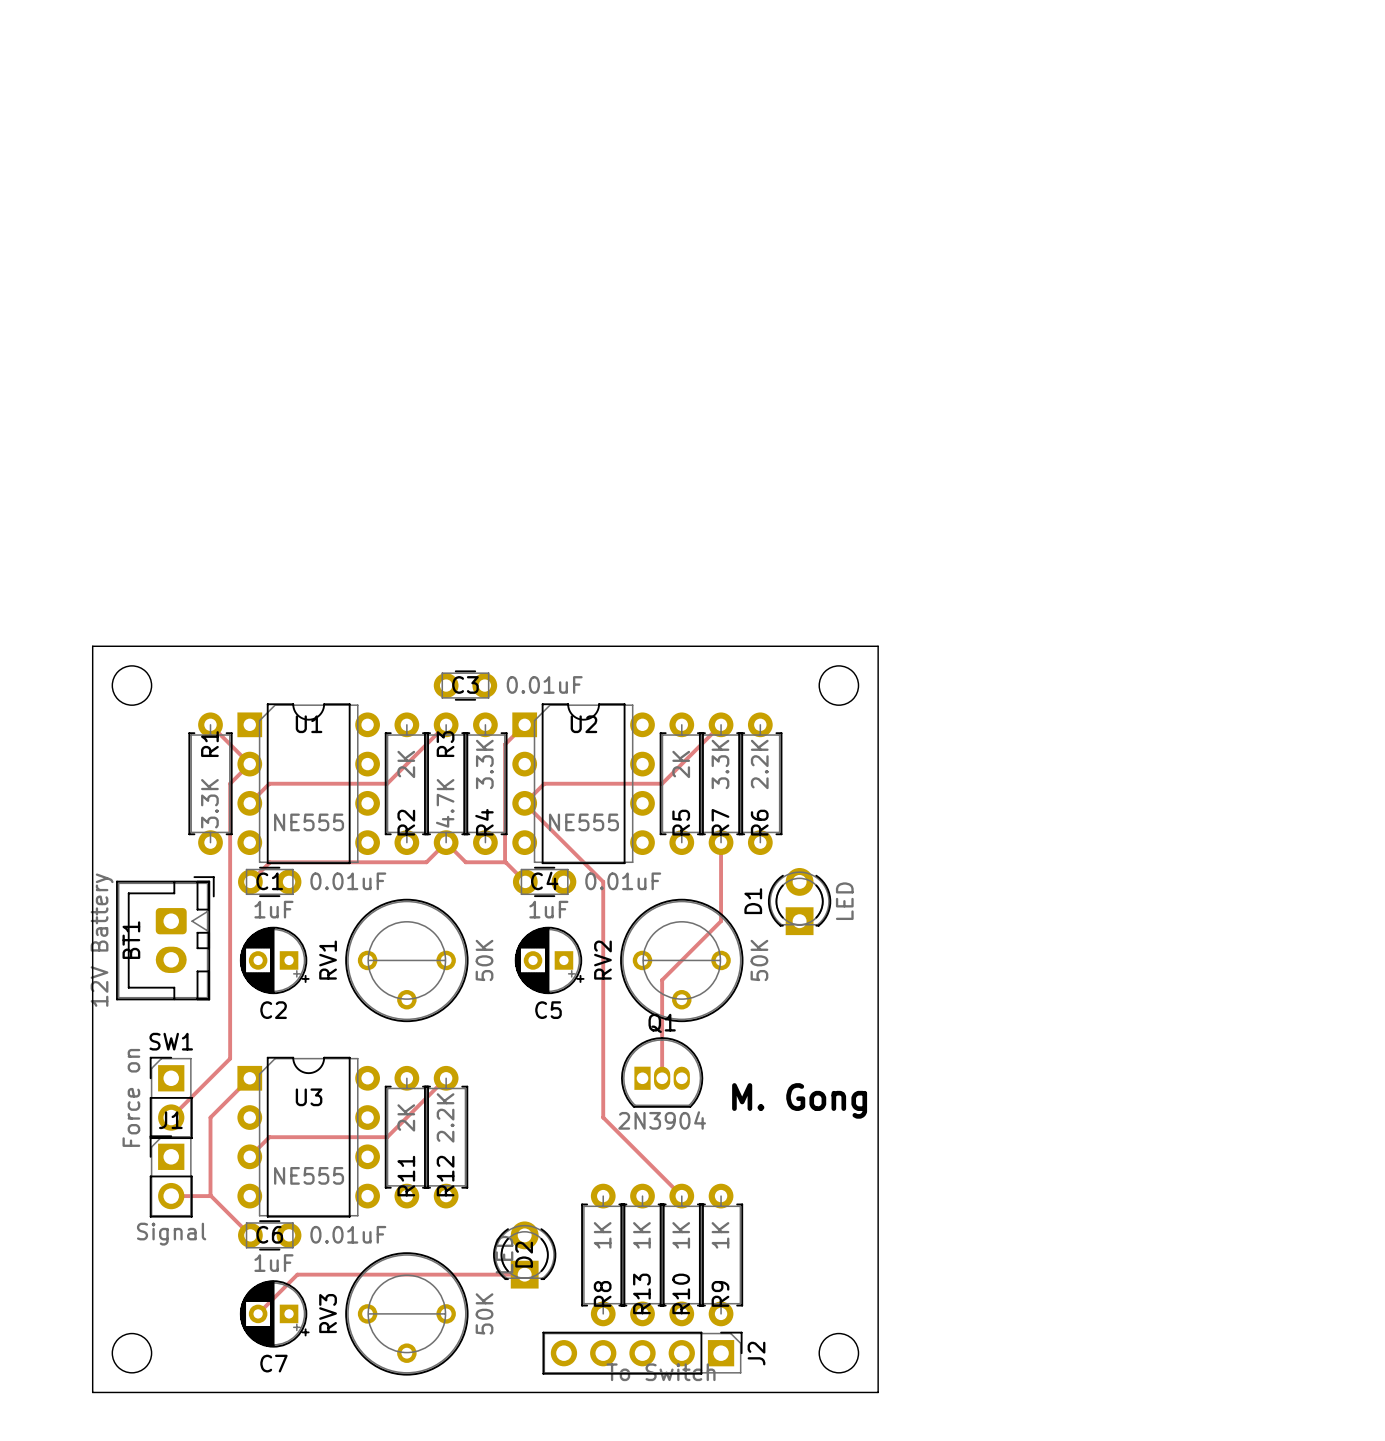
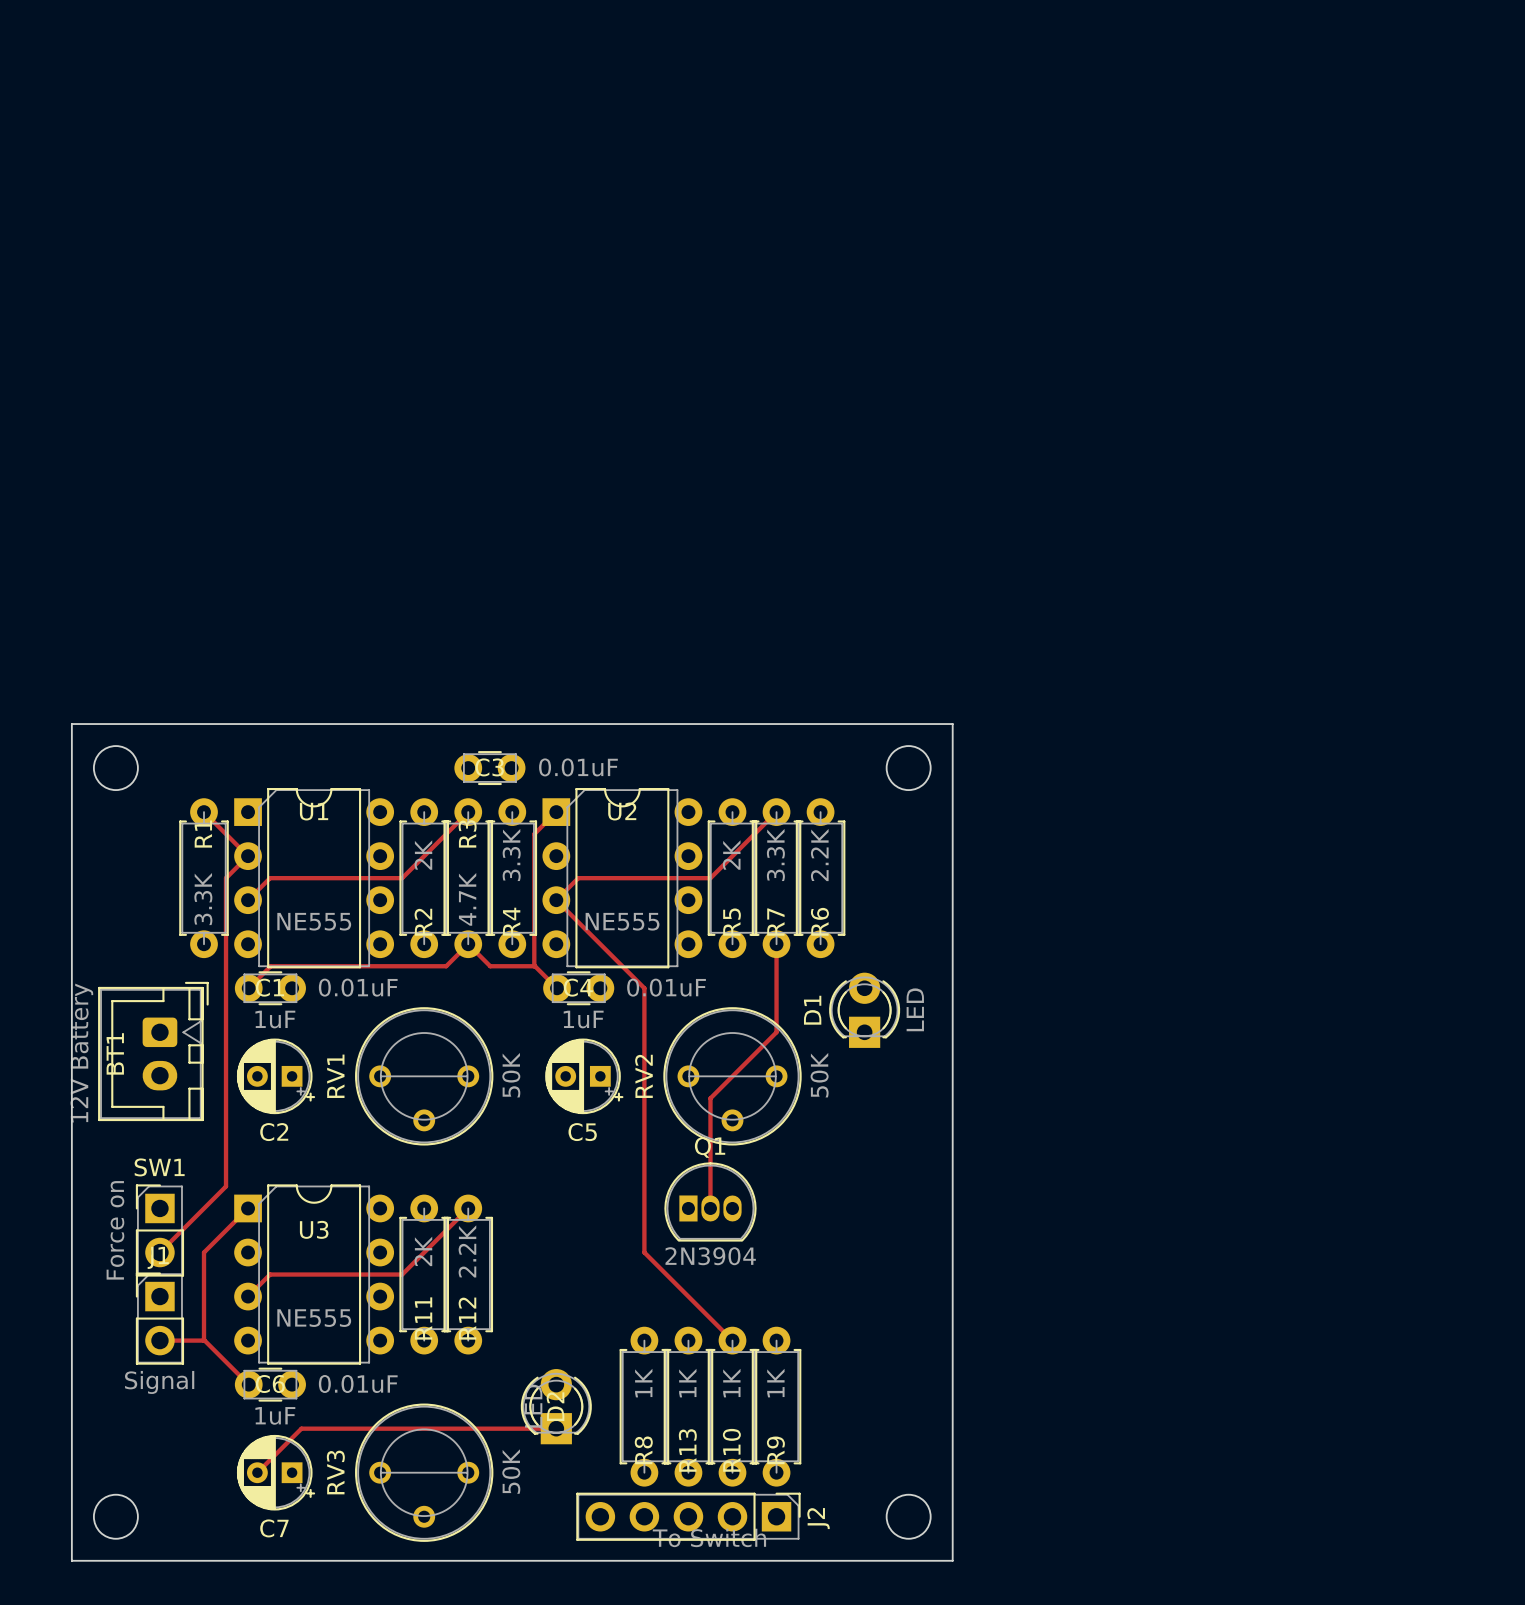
text: M. Gong (799, 1100) -> none

